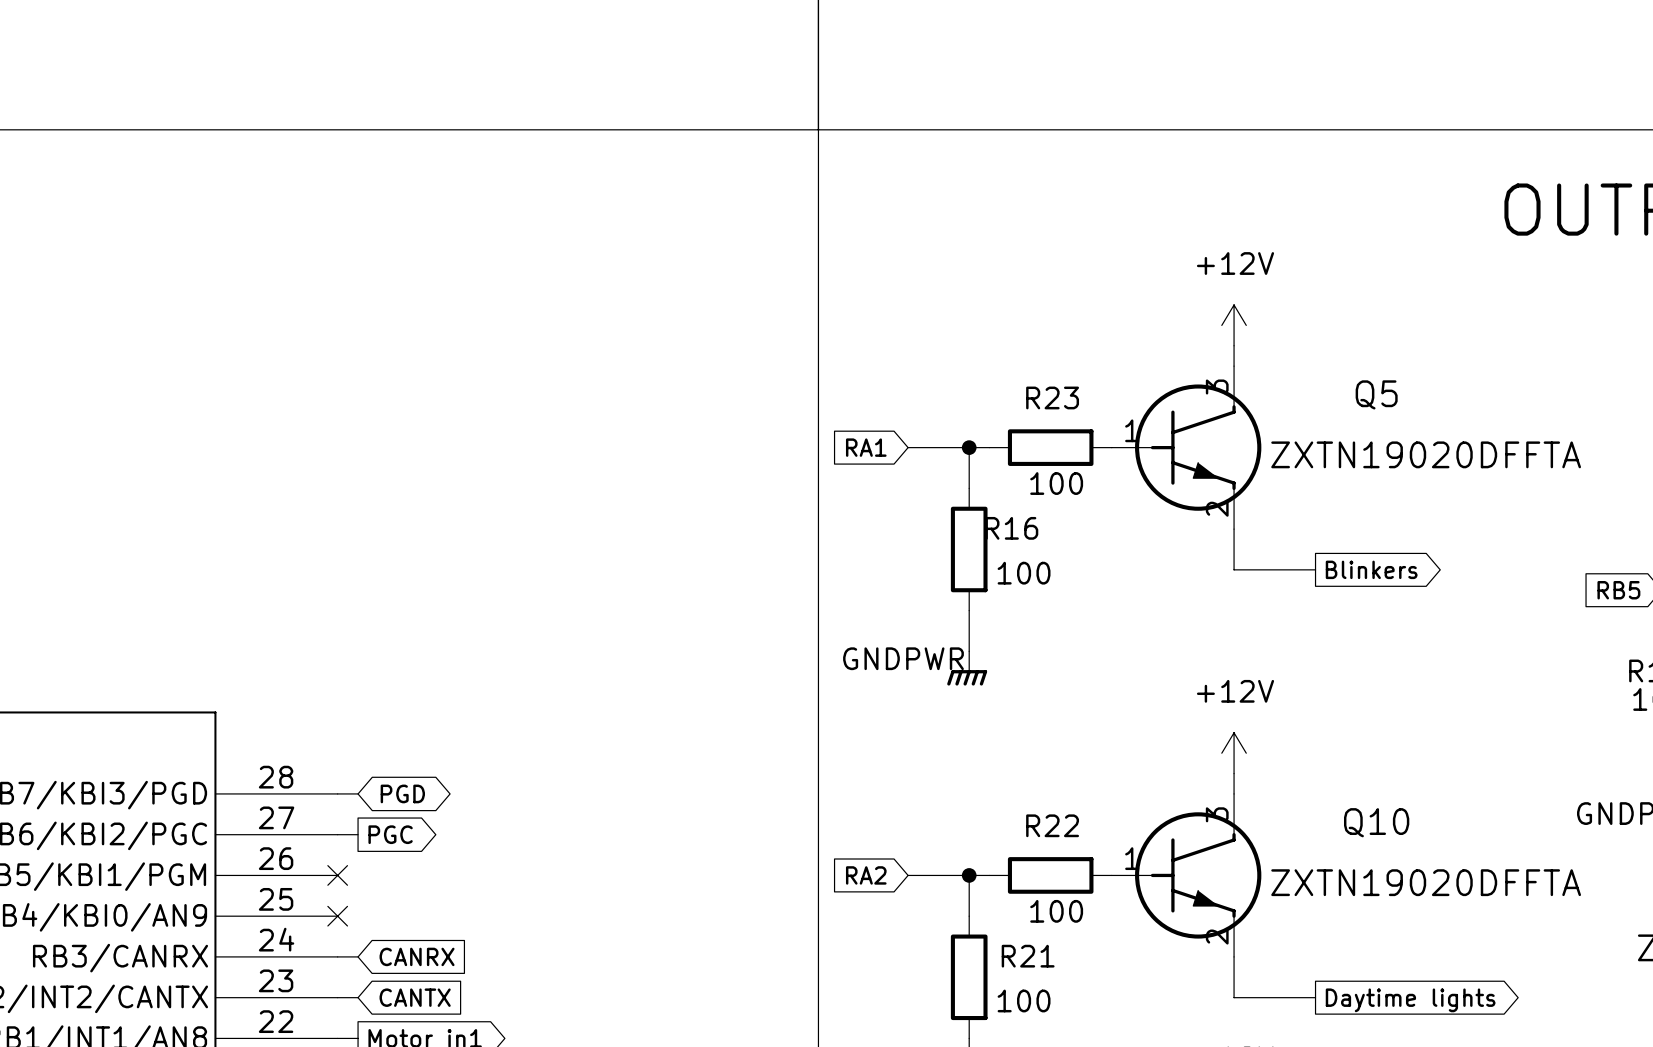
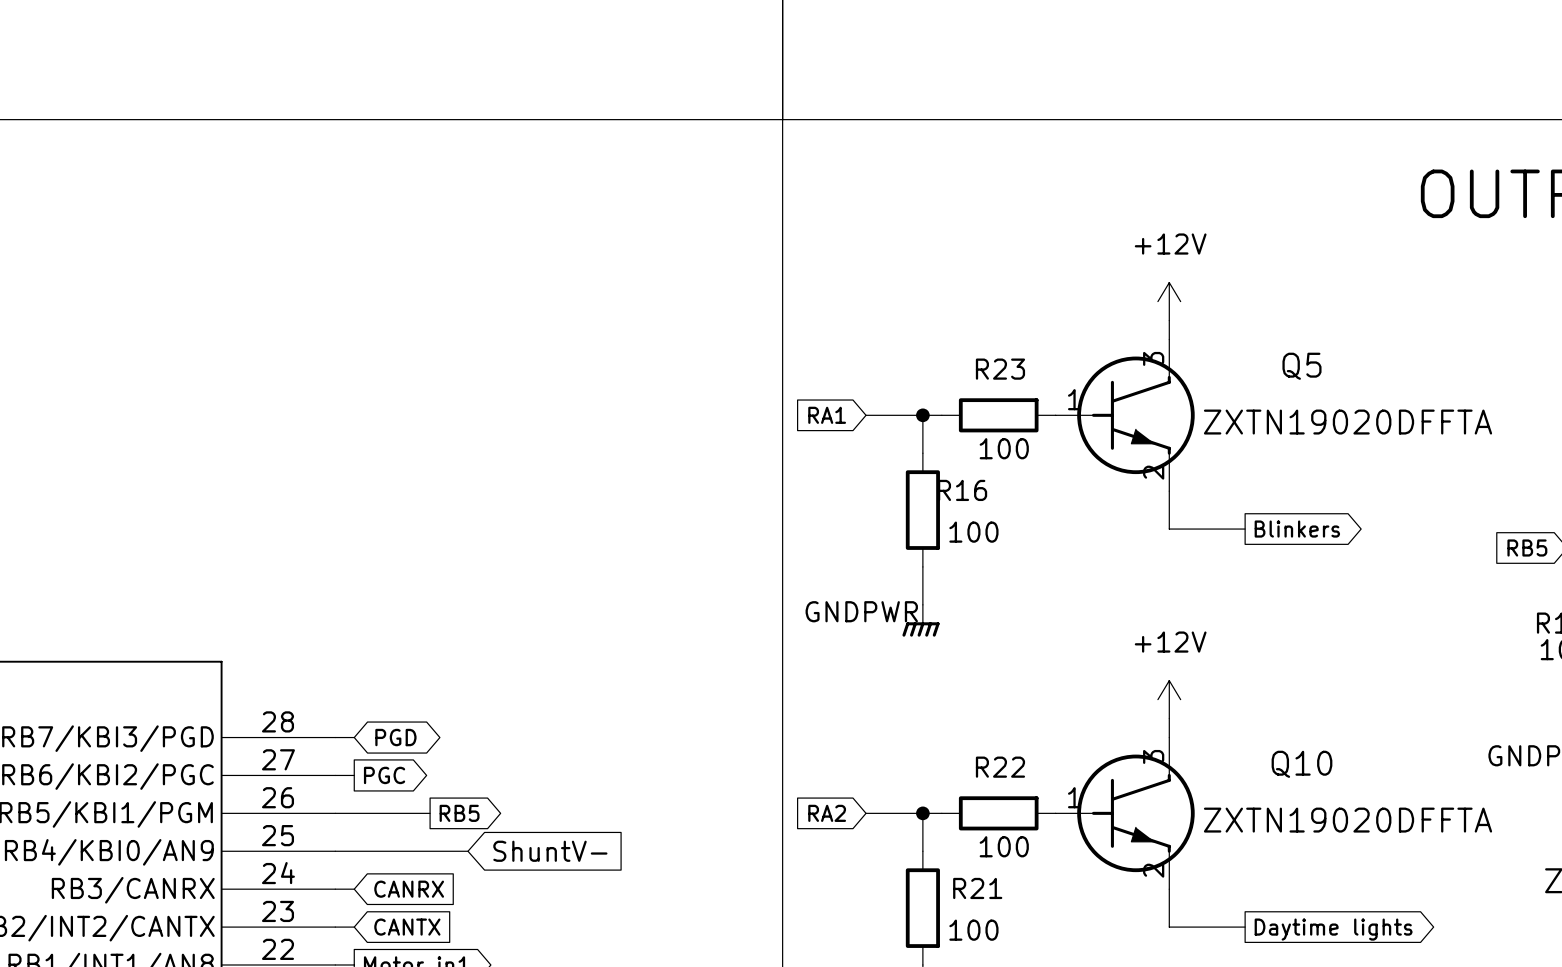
wire: none -> (335, 813) (430, 813)
no-connect mark: (337, 875) -> none
global label: none -> RB5 (459, 813)
wire: none -> (335, 851) (467, 851)
no-connect mark: (337, 916) -> none
global label: none -> ShuntV- (550, 851)

